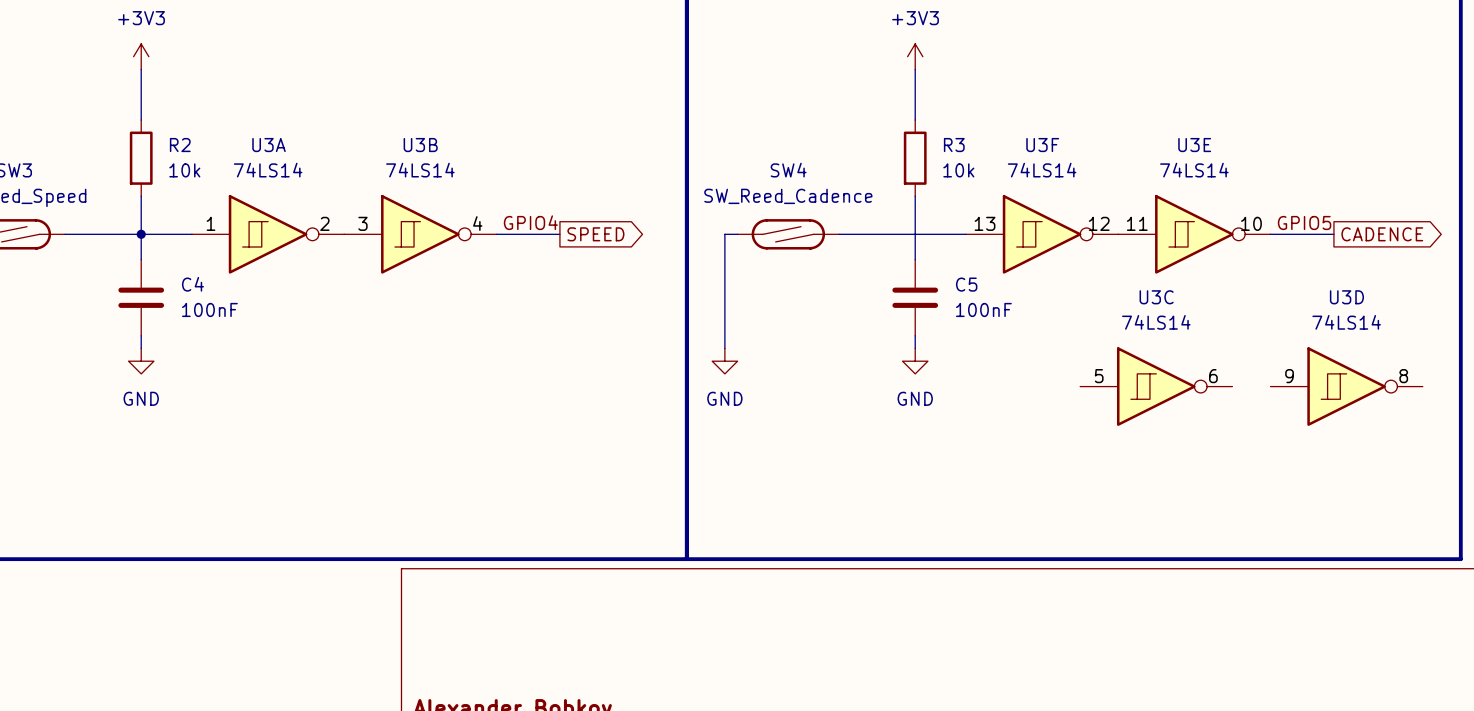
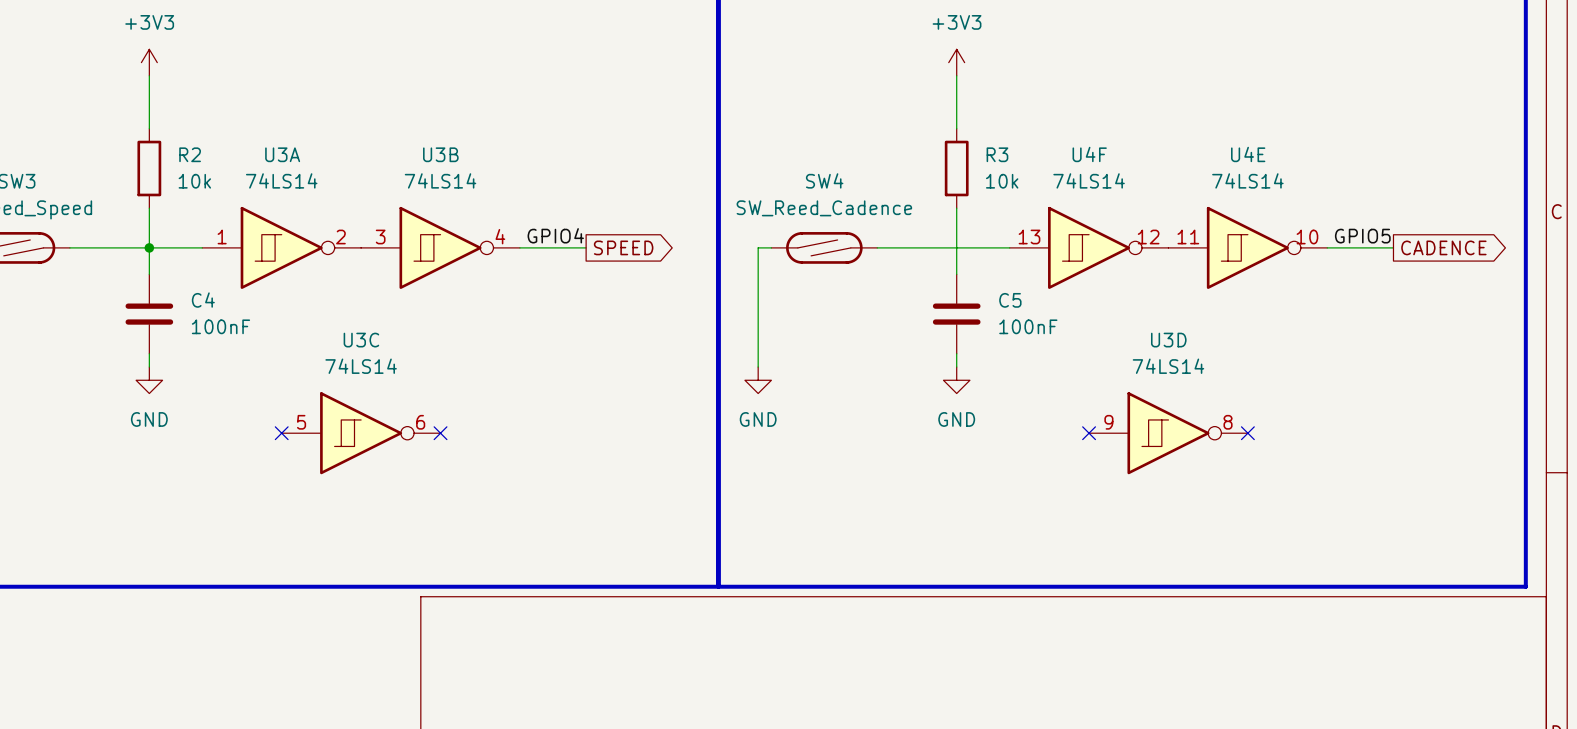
U3F name: U3F (1042, 145) -> U4F (1089, 154)
U3E name: U3E (1194, 145) -> U4E (1248, 154)
U3C position: (1156, 386) -> (361, 433)
U3D position: (1346, 386) -> (1168, 433)
no-connect mark: none -> (281, 433)
no-connect mark: none -> (440, 433)
no-connect mark: none -> (1089, 433)
no-connect mark: none -> (1247, 433)

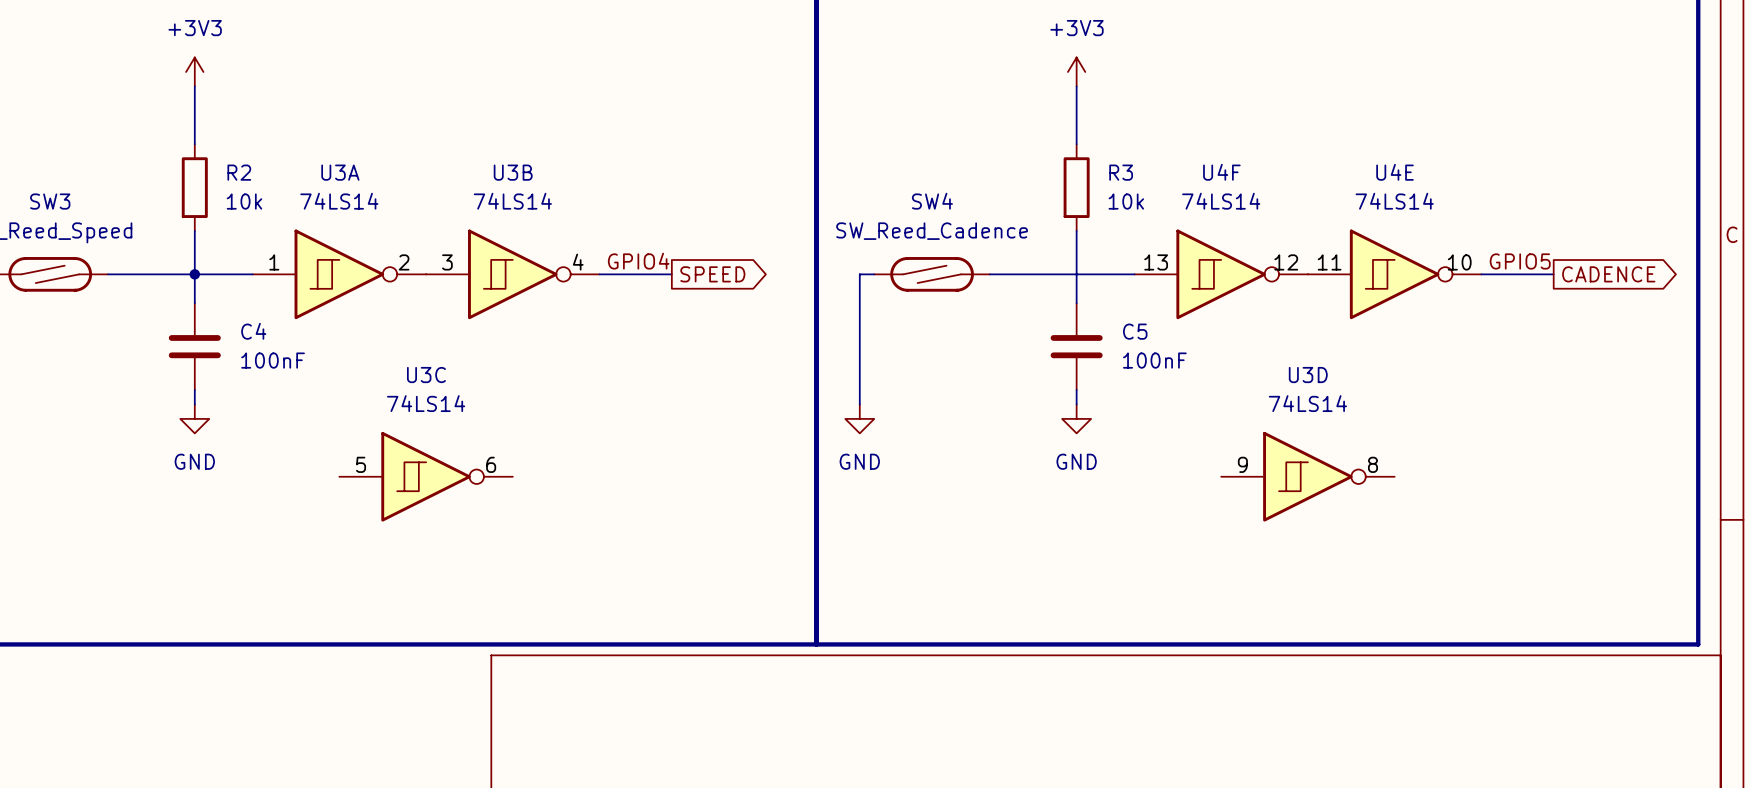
no-connect mark: (281, 433) -> none
no-connect mark: (440, 433) -> none
no-connect mark: (1089, 433) -> none
no-connect mark: (1247, 433) -> none

